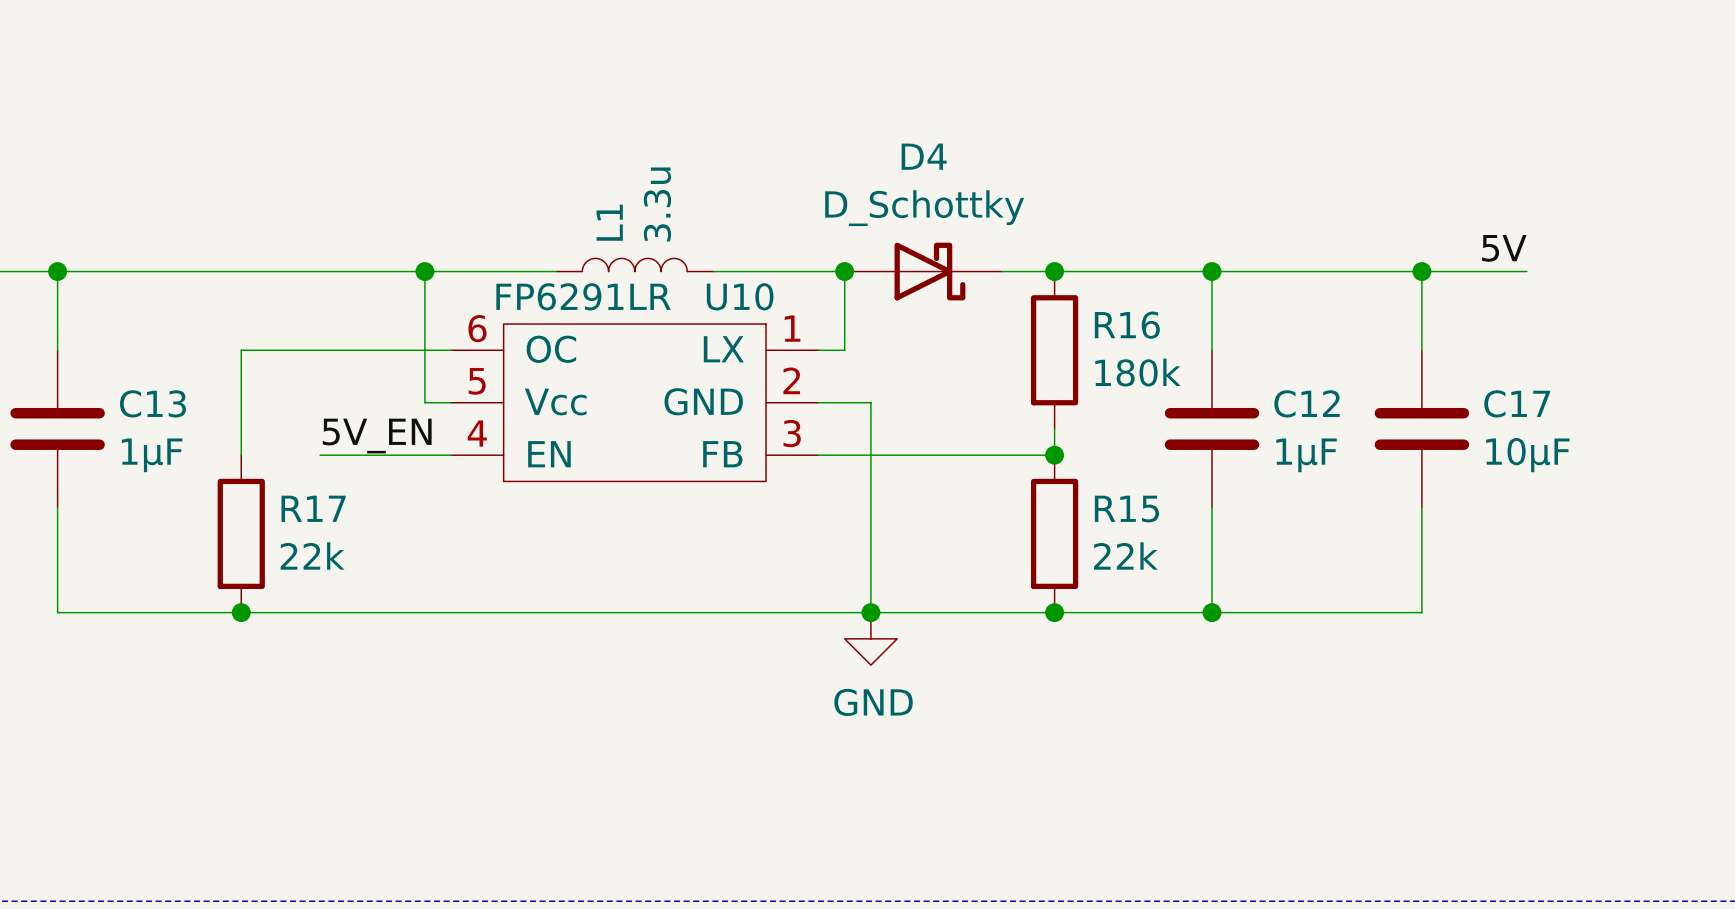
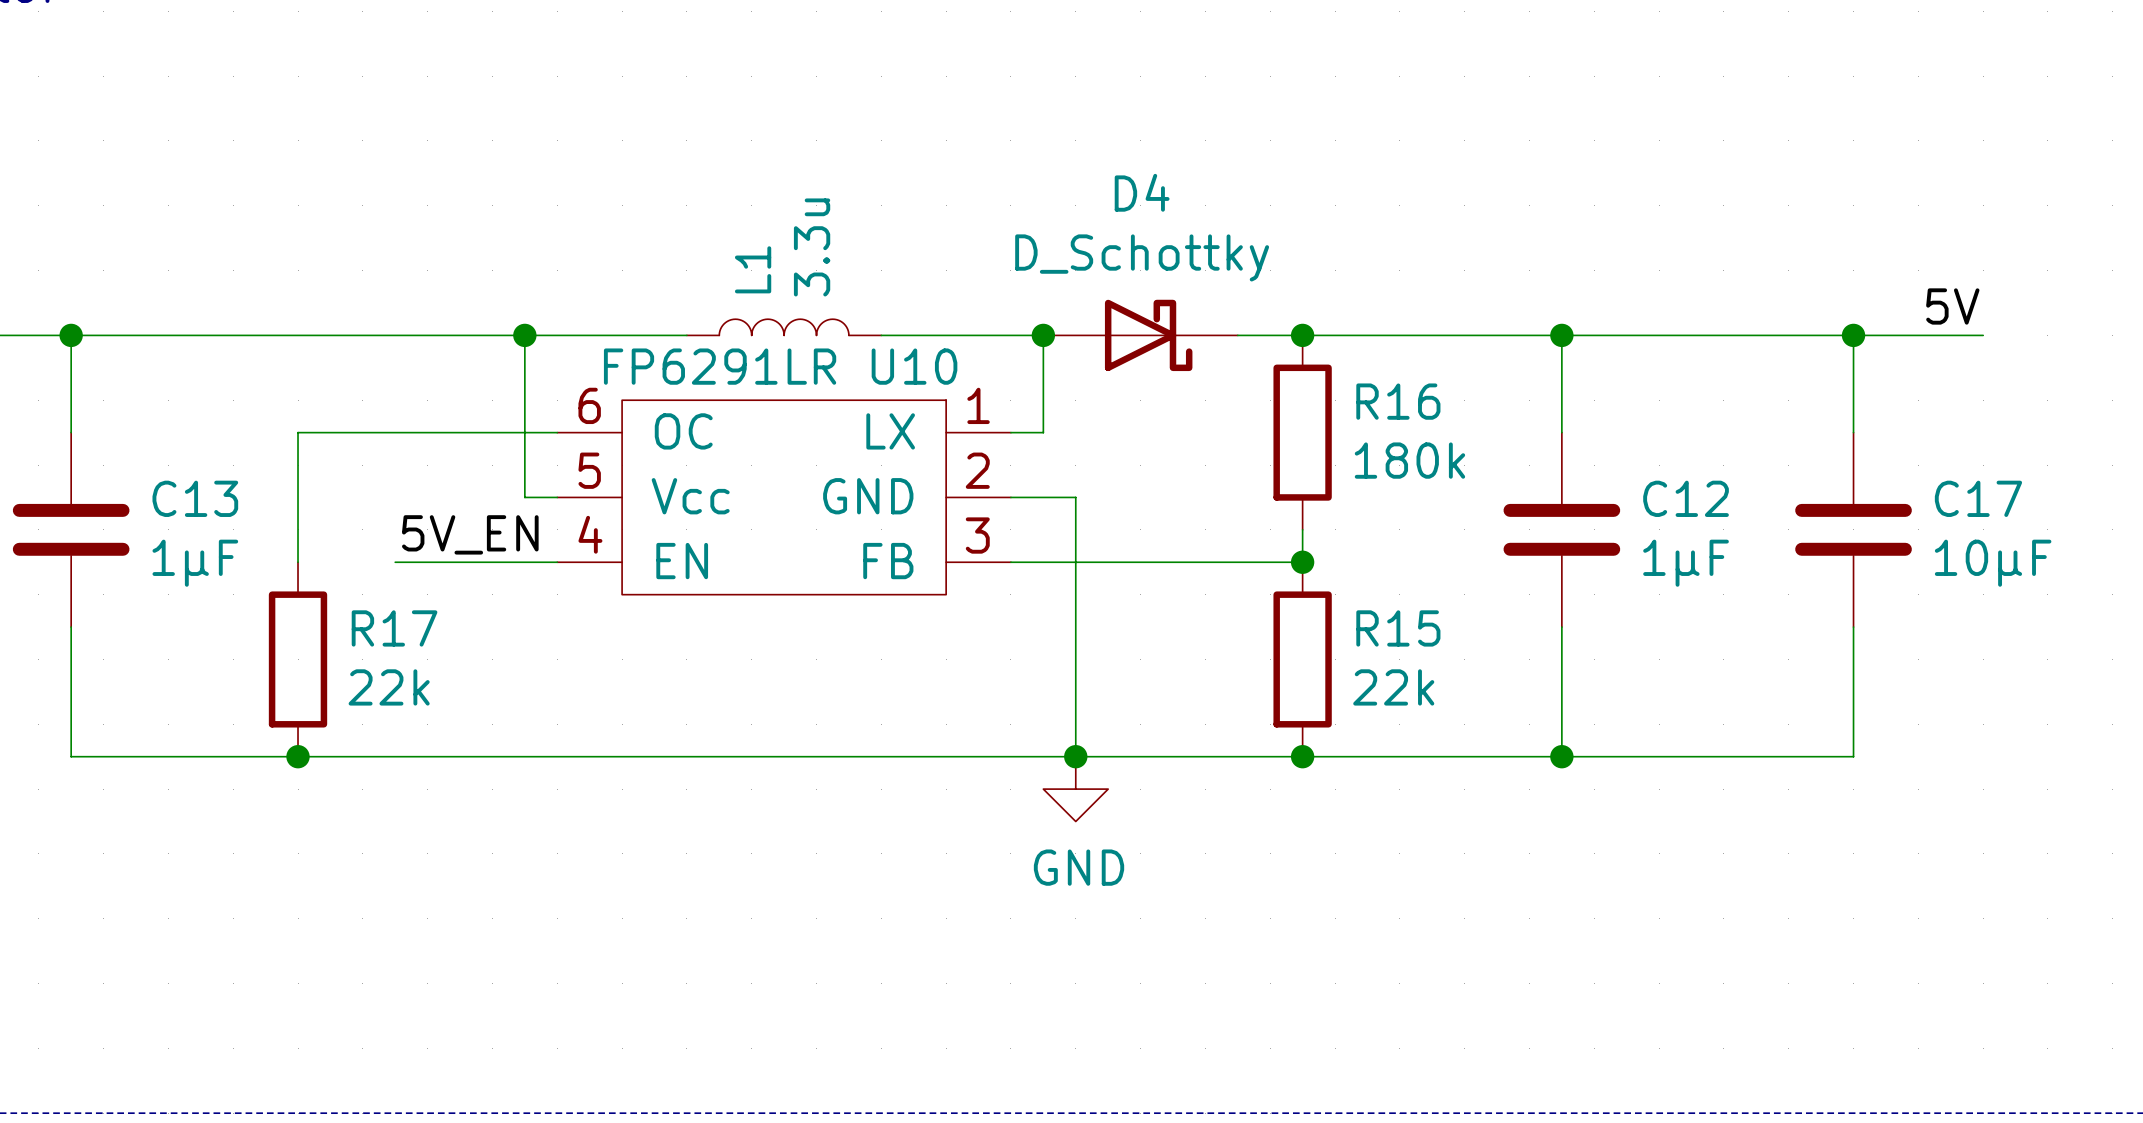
label position: 5V (1504, 248) -> 5V (1952, 306)
wire: (1212, 271) (1212, 350) -> (1561, 335) (1561, 432)
junction position: (1212, 271) -> (1561, 335)
wire: (1421, 271) (1421, 350) -> (1853, 335) (1853, 432)
junction: (1421, 271) -> none
junction: none -> (1853, 335)
wire: none -> (1885, 335) (1983, 335)
C12 position: (1212, 428) -> (1561, 529)
C17 position: (1421, 428) -> (1853, 529)
wire: (1212, 507) (1212, 612) -> (1561, 627) (1561, 756)
wire: (1421, 507) (1421, 612) -> (1853, 627) (1853, 756) (1756, 756)
junction position: (1212, 612) -> (1561, 756)

